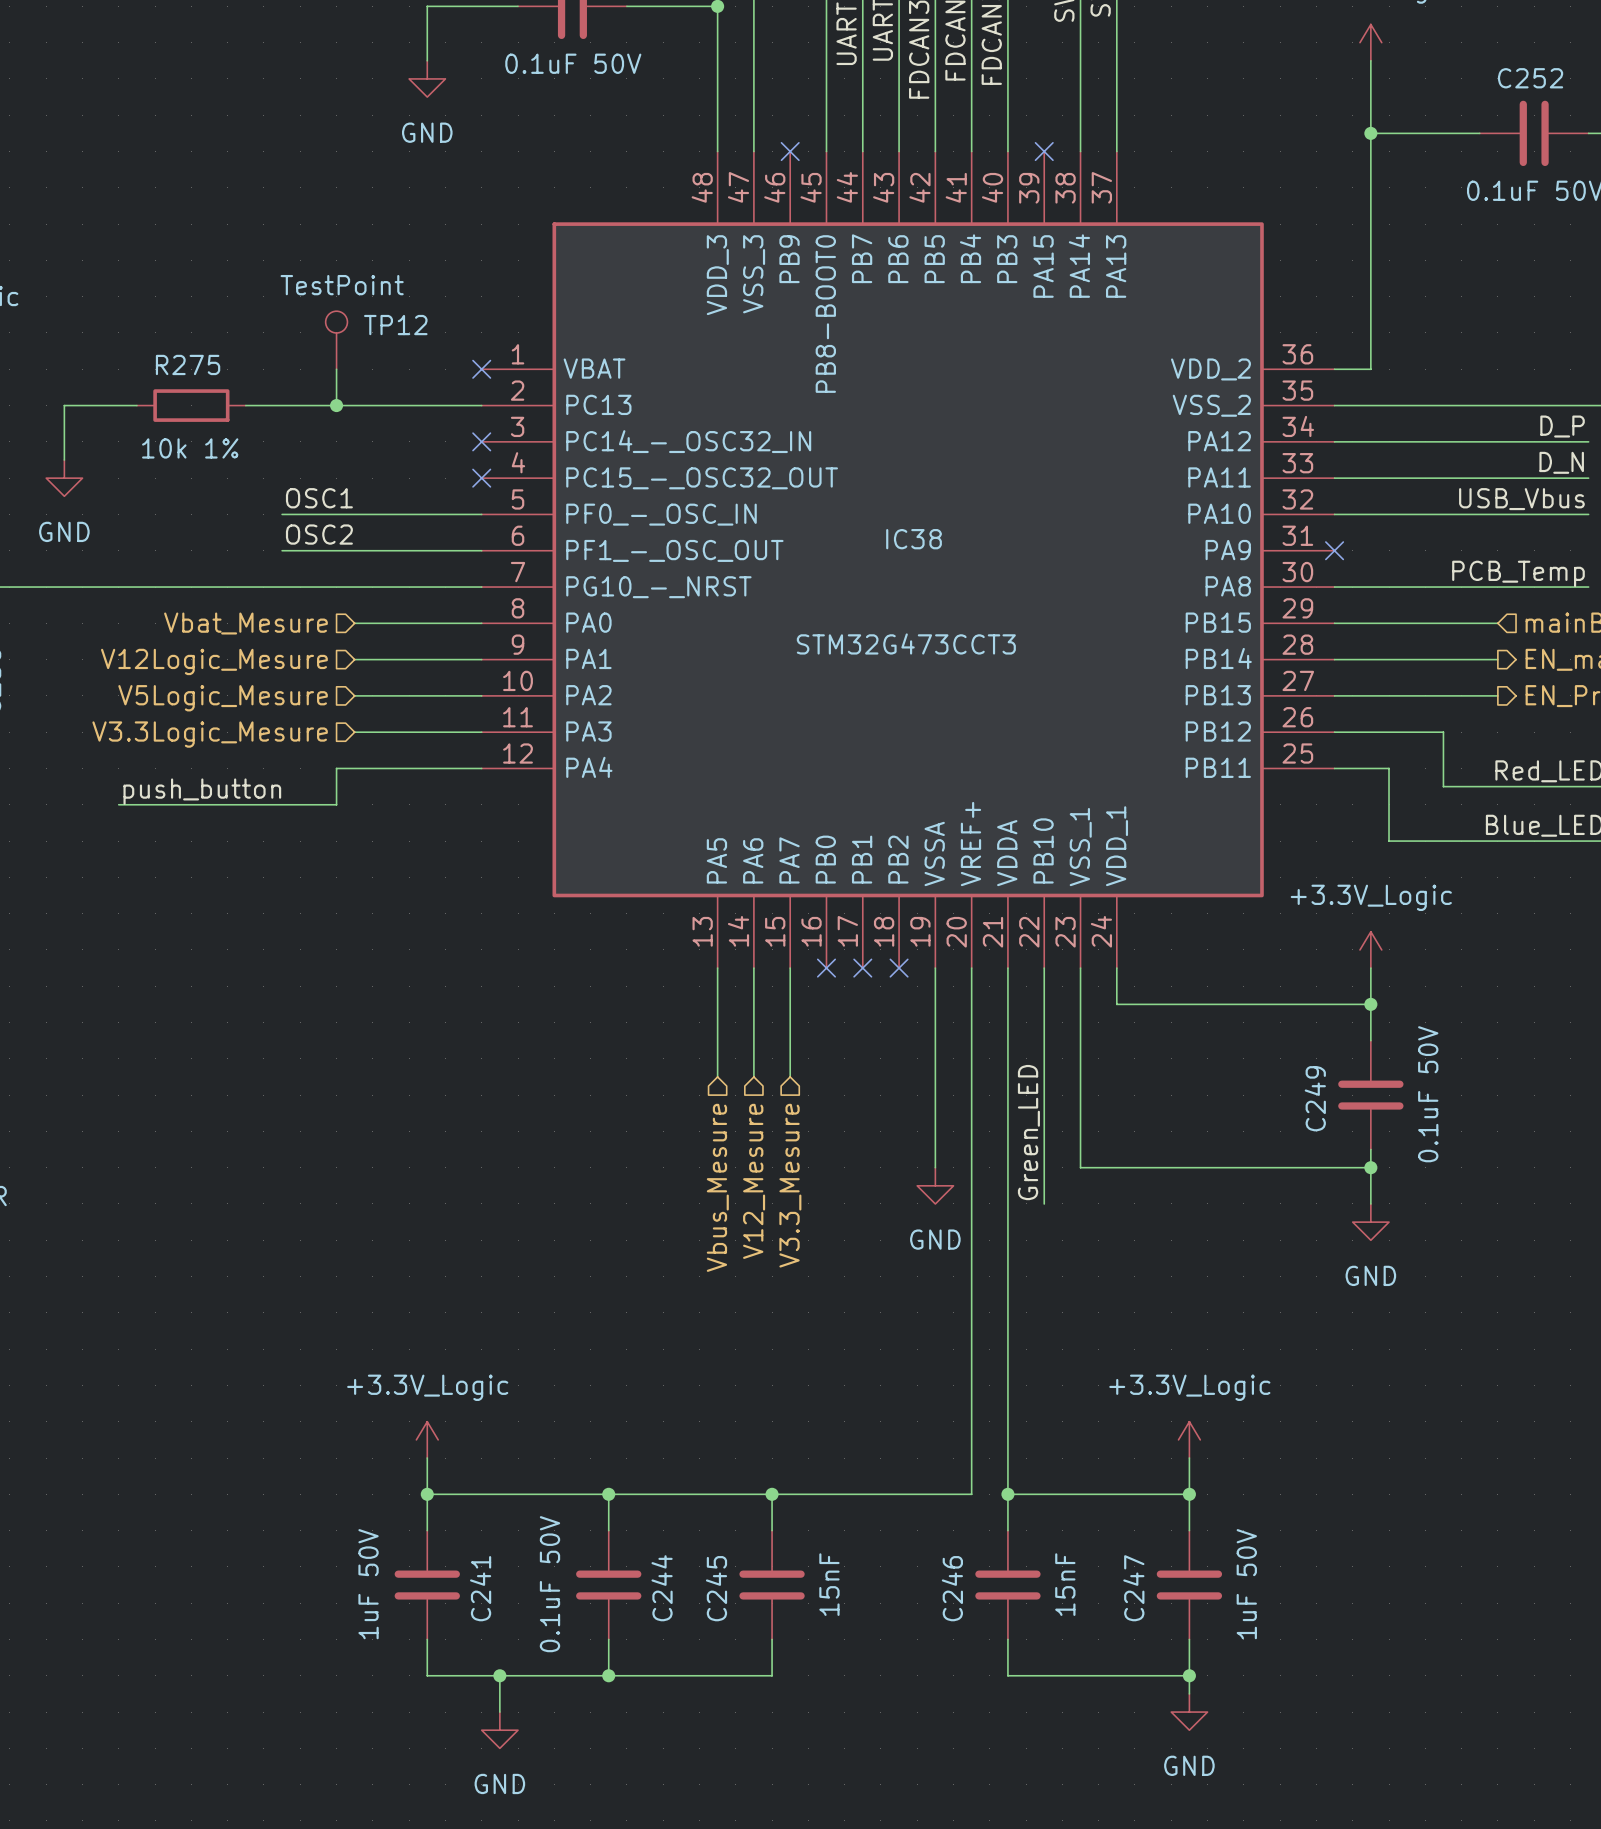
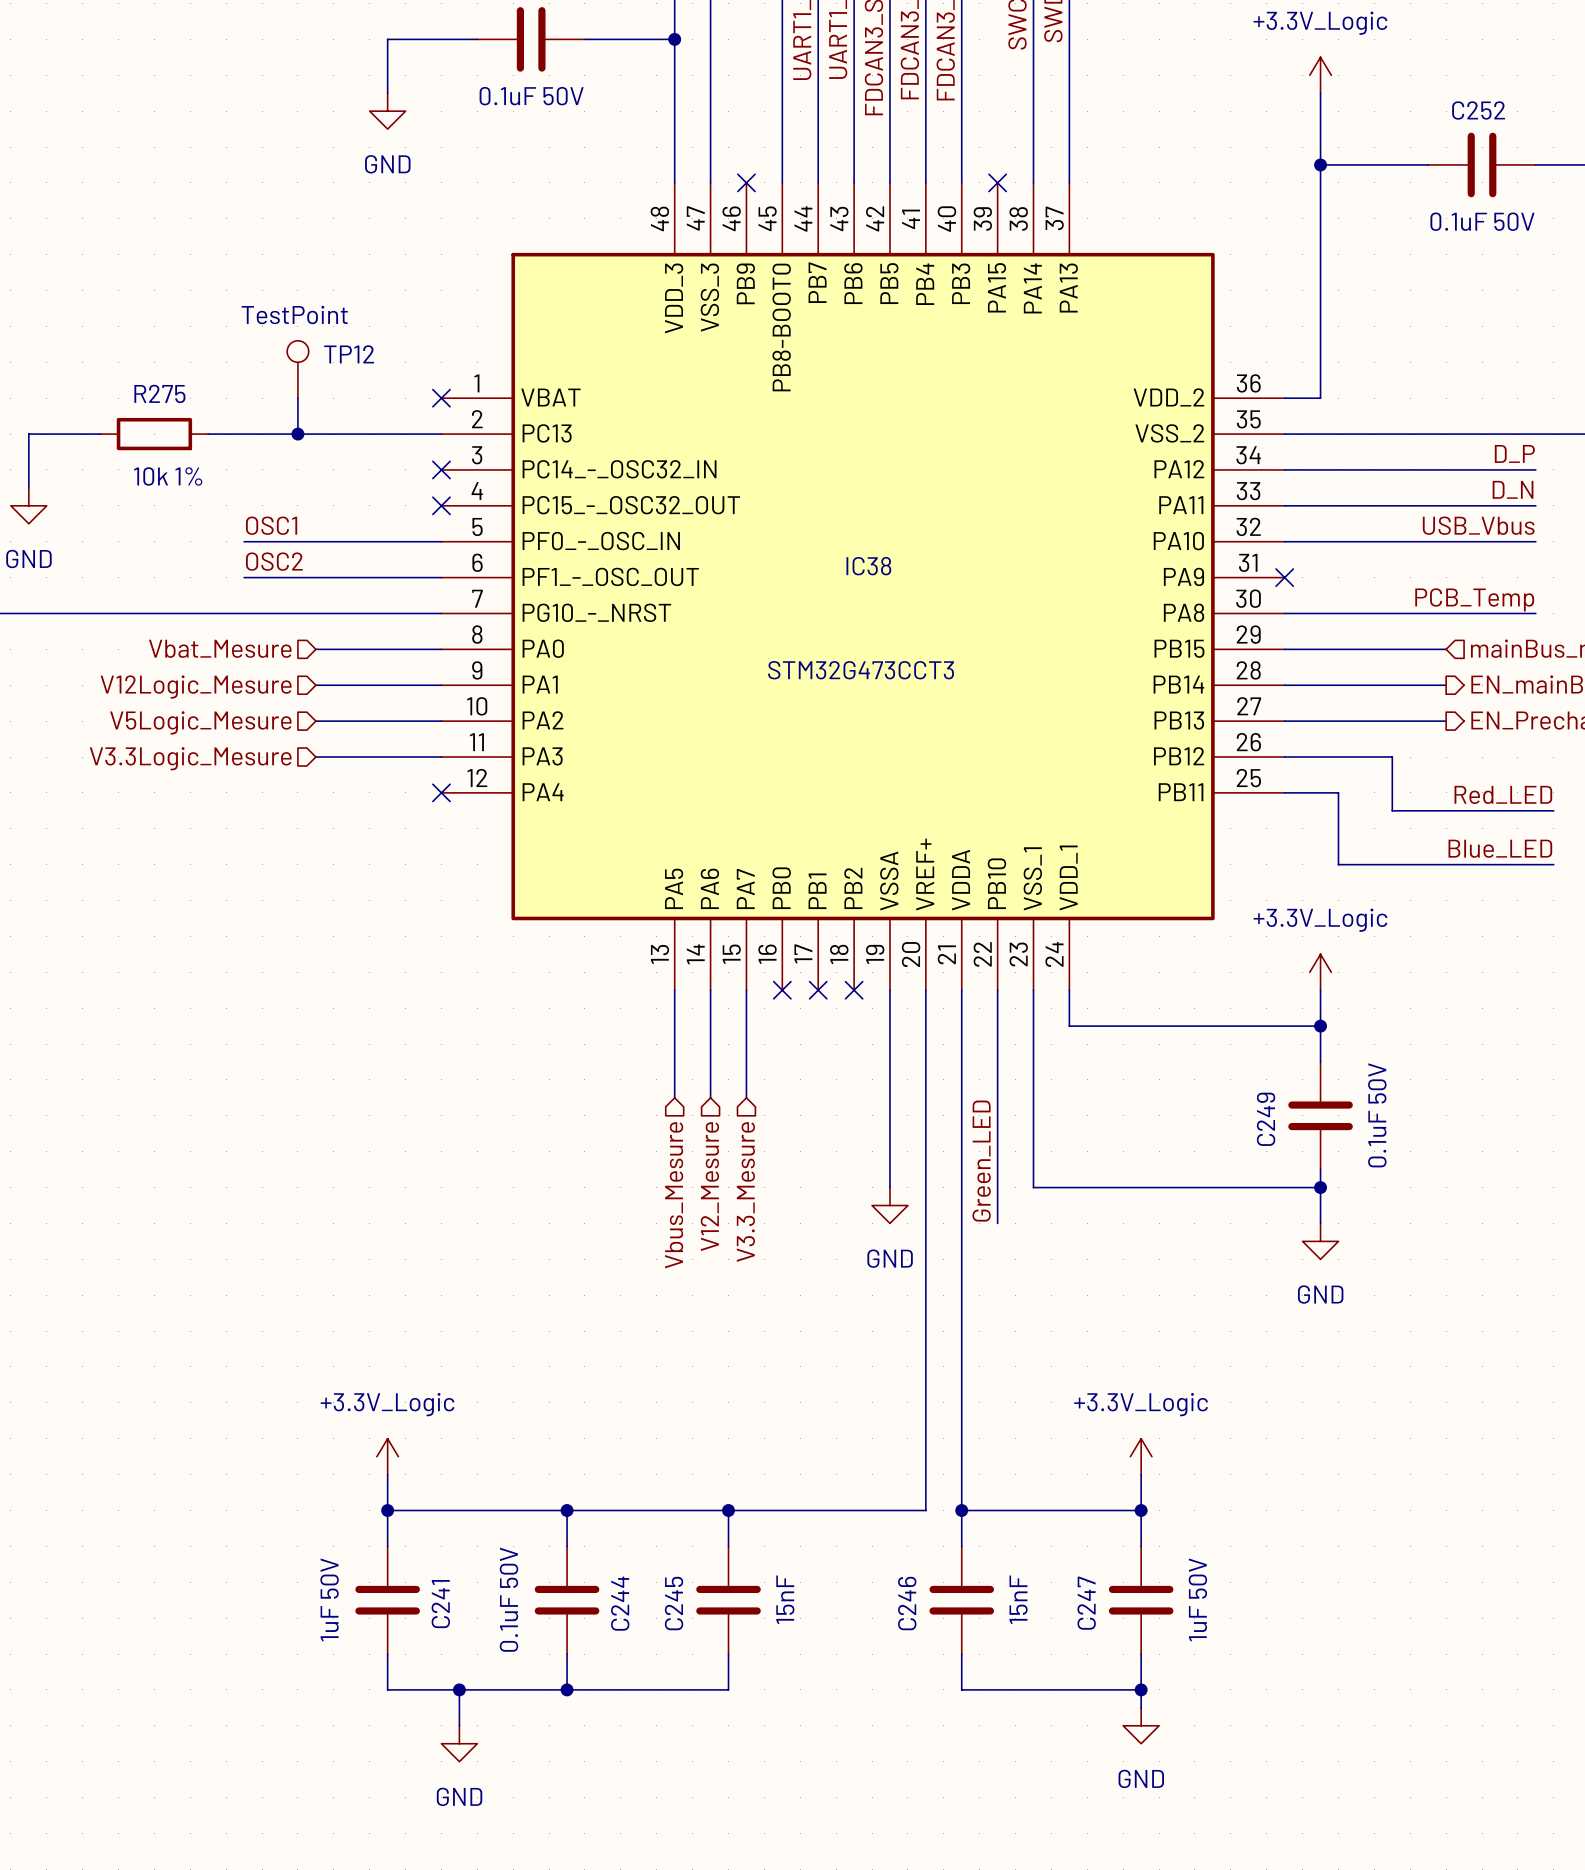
wire: (481, 768) (336, 768) (336, 804) (118, 804) -> none
no-connect mark: none -> (441, 792)
label: push_button (202, 791) -> none

